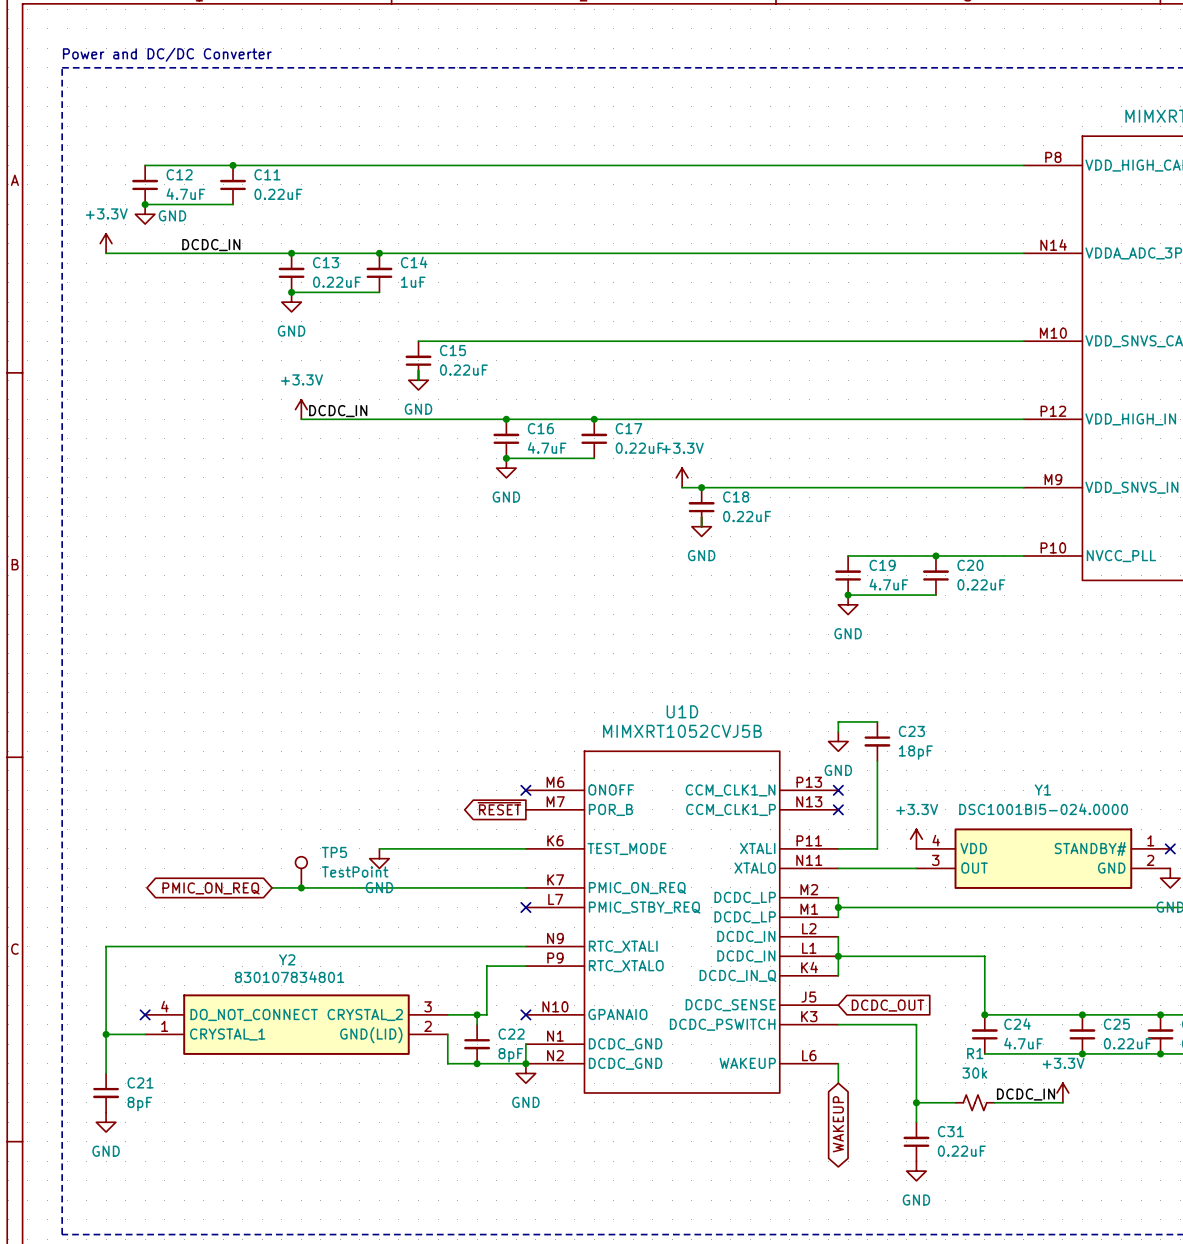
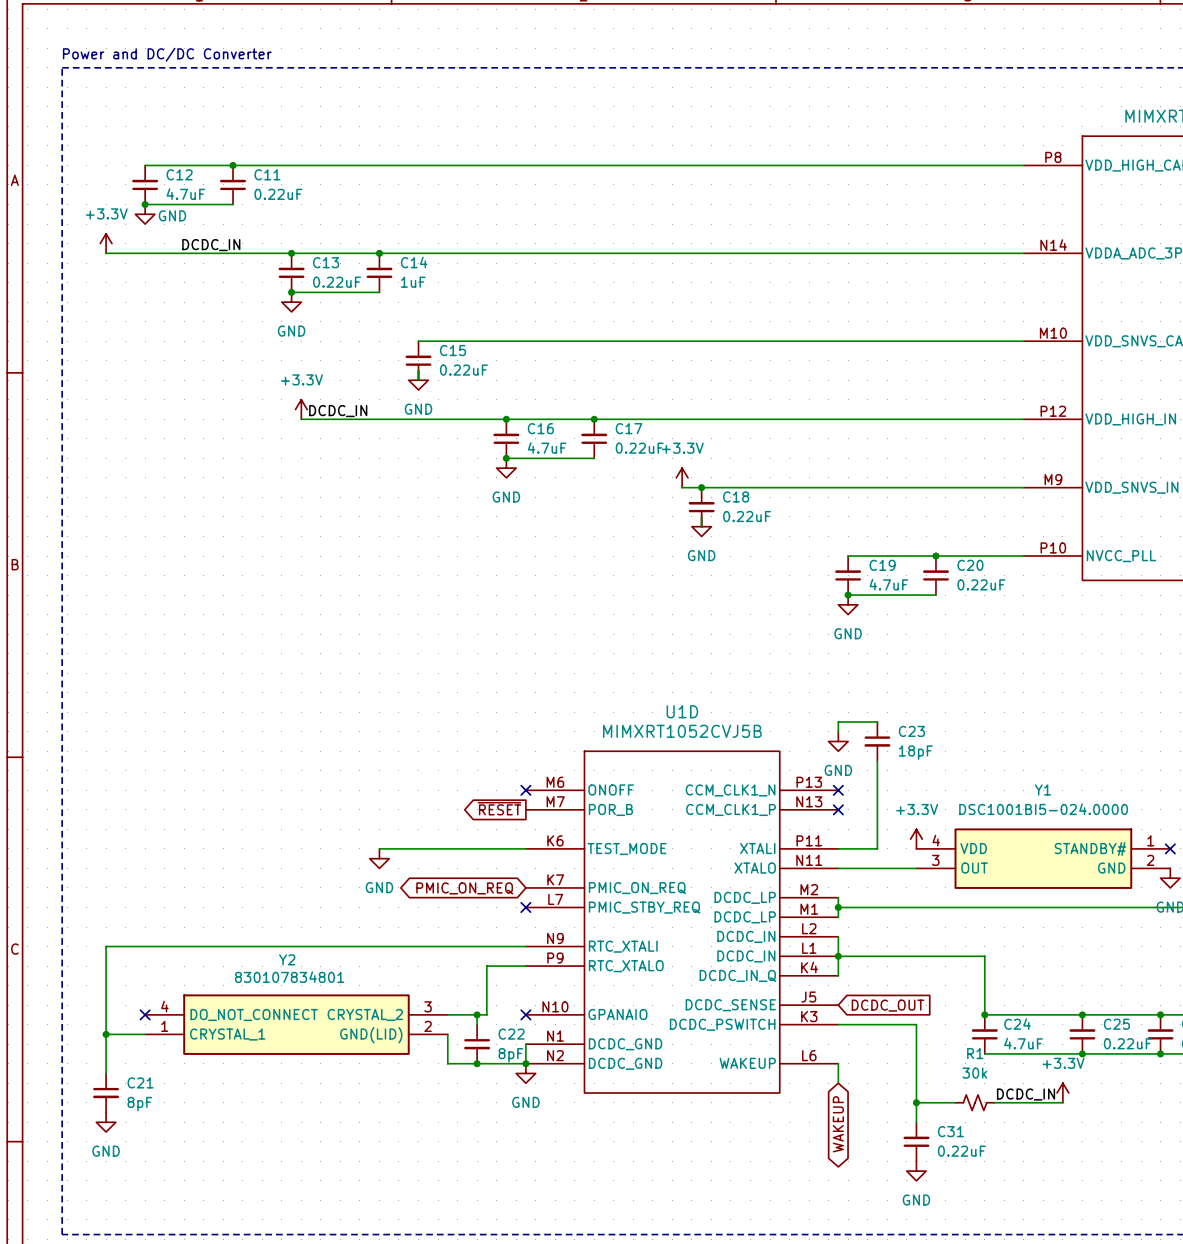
TP5: TestPoint (301, 872) -> none
wire: (272, 887) (525, 887) -> none
junction: (301, 887) -> none
global label: PMIC_ON_REQ (211, 888) -> none
global label: none -> PMIC_ON_REQ (464, 888)

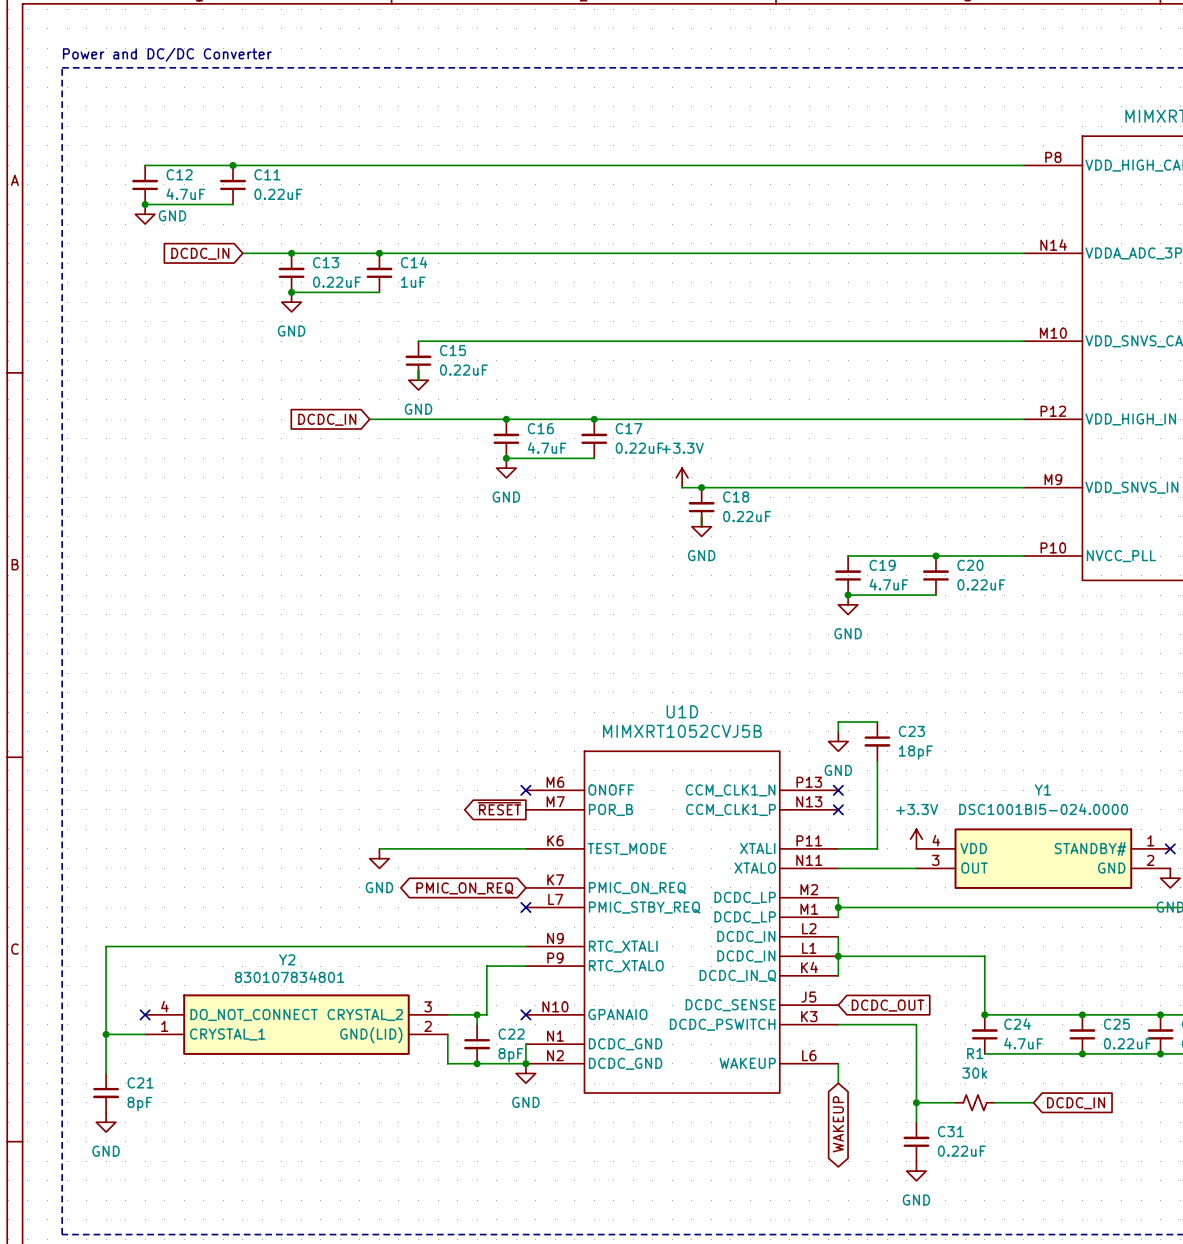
power symbol: +3.3V (106, 243) -> none
label: DCDC_IN (211, 245) -> none
wire: (106, 253) (242, 253) -> none
global label: none -> DCDC_IN (200, 253)
power symbol: +3.3V (301, 409) -> none
label: DCDC_IN (338, 411) -> none
wire: (301, 419) (369, 419) -> none
global label: none -> DCDC_IN (327, 419)
power symbol: +3.3V (1062, 1092) -> none
label: DCDC_IN (1026, 1094) -> none
wire: (1033, 1102) (1062, 1102) -> none
global label: none -> DCDC_IN (1076, 1103)

